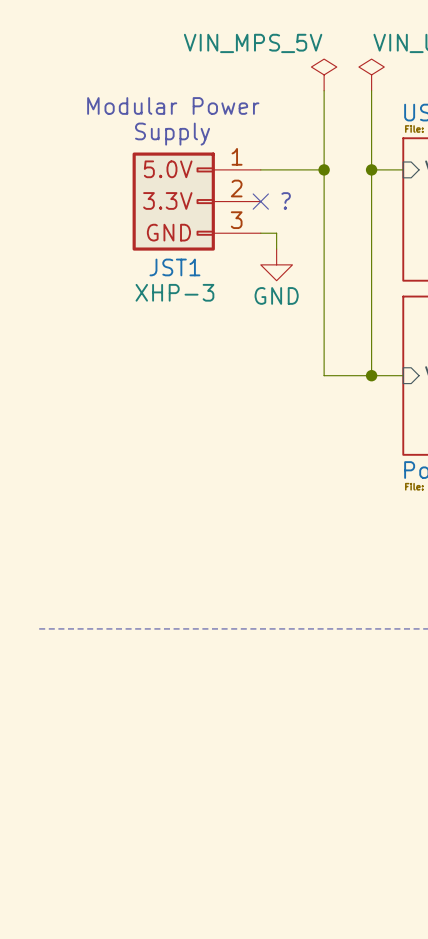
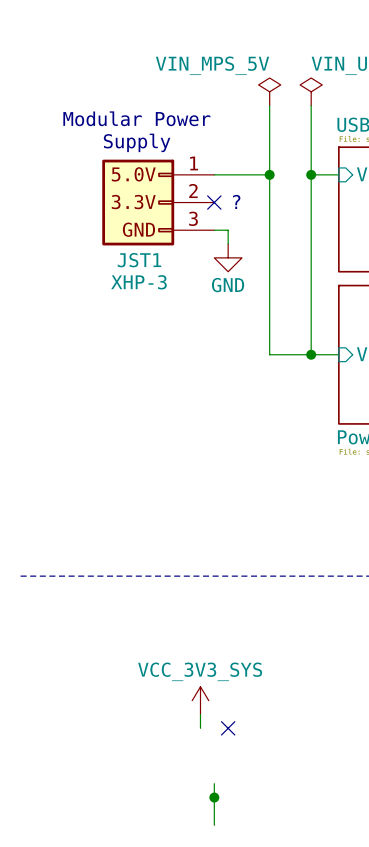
power symbol: none -> VCC_3V3_SYS (200, 700)
wire: none -> (200, 714) (200, 728)
no-connect mark: none -> (228, 728)
wire: none -> (214, 783) (214, 825)
junction: none -> (214, 797)

